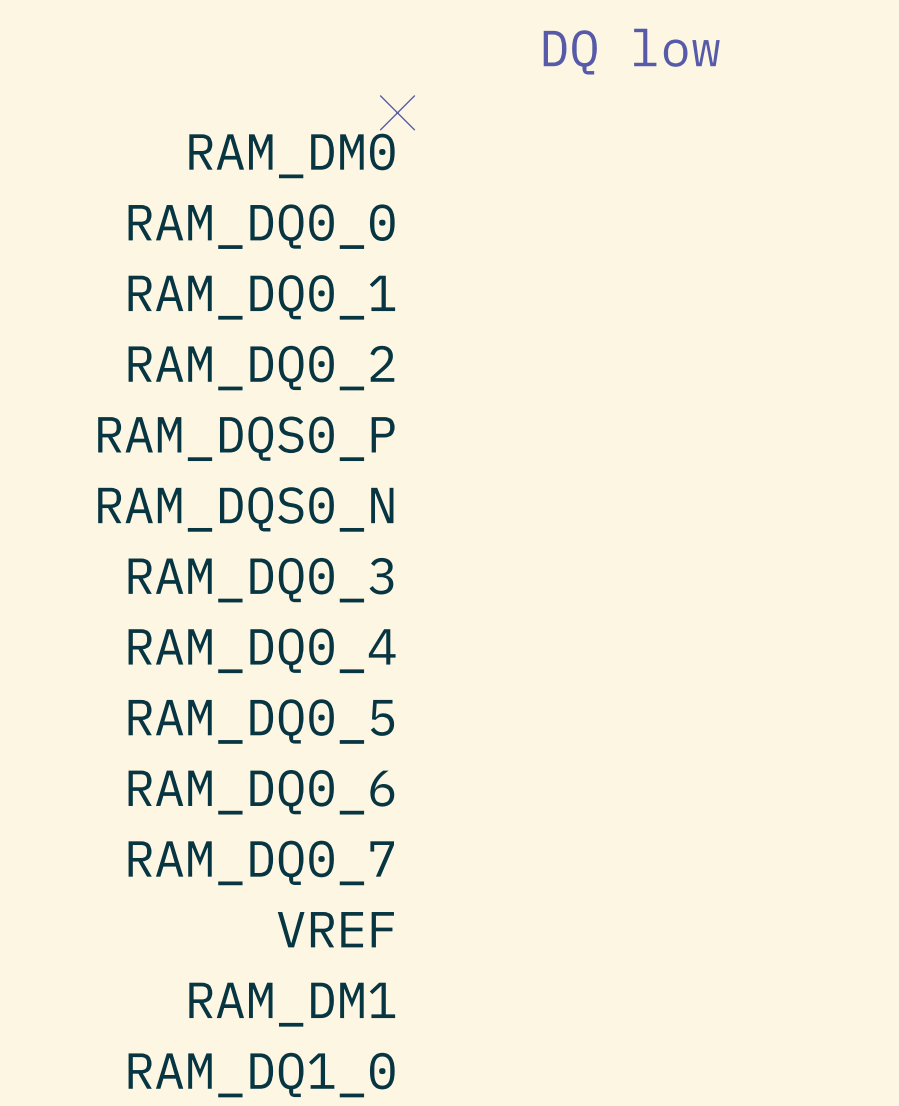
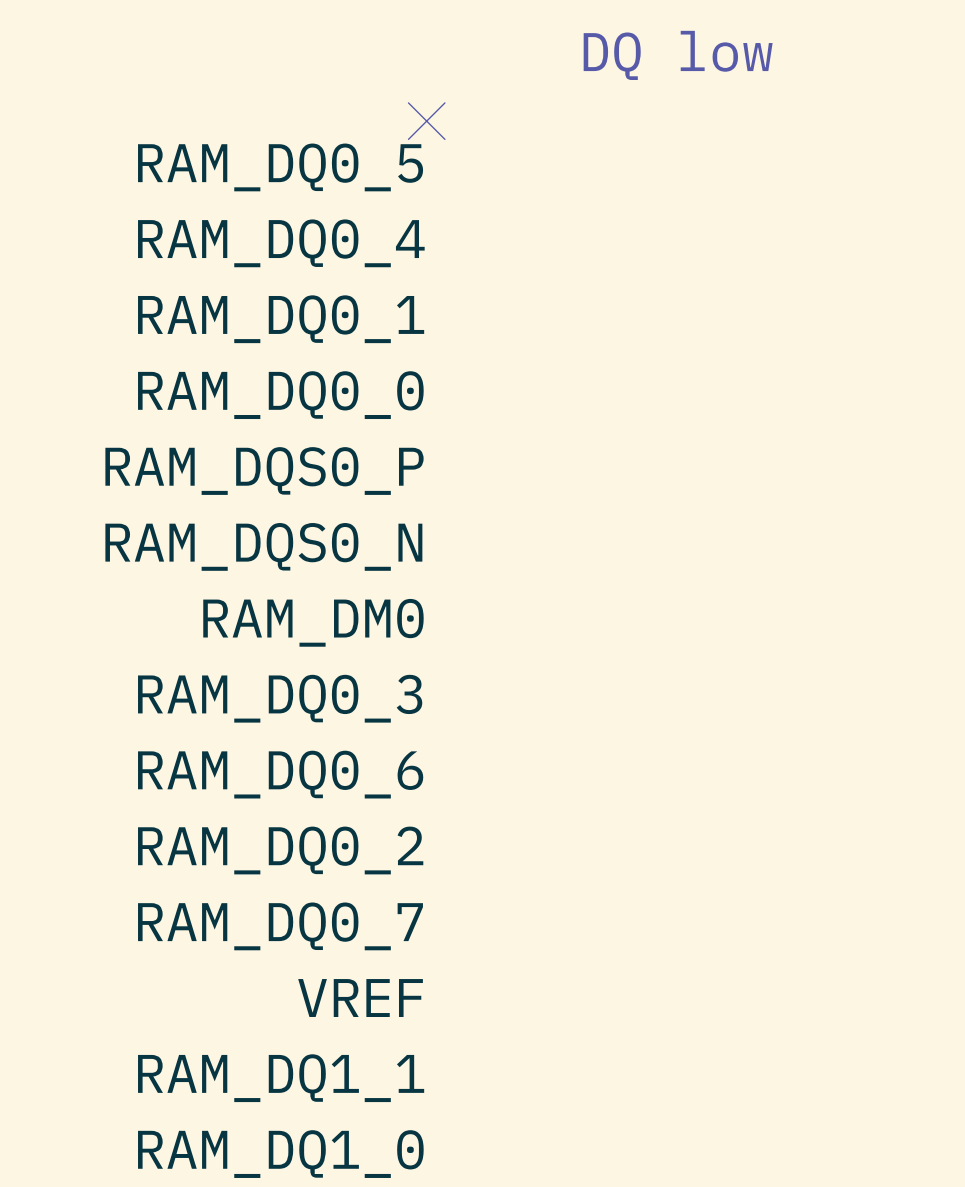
label: RAM_DM0 (292, 155) -> RAM_DQ0_5 (280, 167)
label: RAM_DQ0_0 (261, 226) -> RAM_DQ0_4 (281, 243)
label: RAM_DQ0_2 (261, 368) -> RAM_DQ0_0 (280, 395)
label: RAM_DQ0_3 (260, 580) -> RAM_DM0 (313, 622)
label: RAM_DQ0_4 (262, 650) -> RAM_DQ0_3 (280, 698)
label: RAM_DQ0_5 (261, 721) -> RAM_DQ0_6 (280, 774)
label: RAM_DQ0_6 (261, 792) -> RAM_DQ0_2 (280, 850)
label: RAM_DM1 (292, 1004) -> RAM_DQ1_1 (281, 1078)

